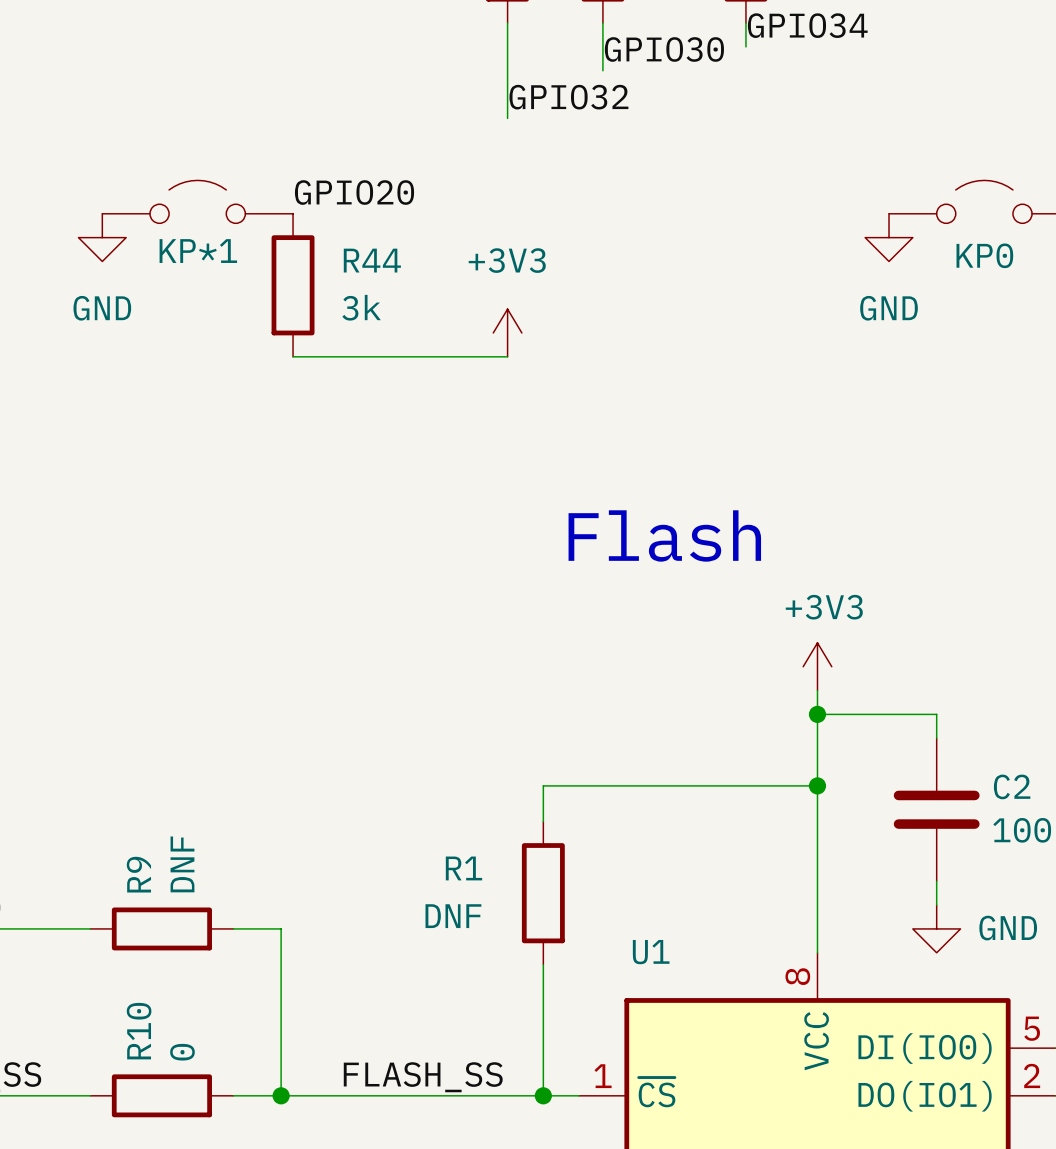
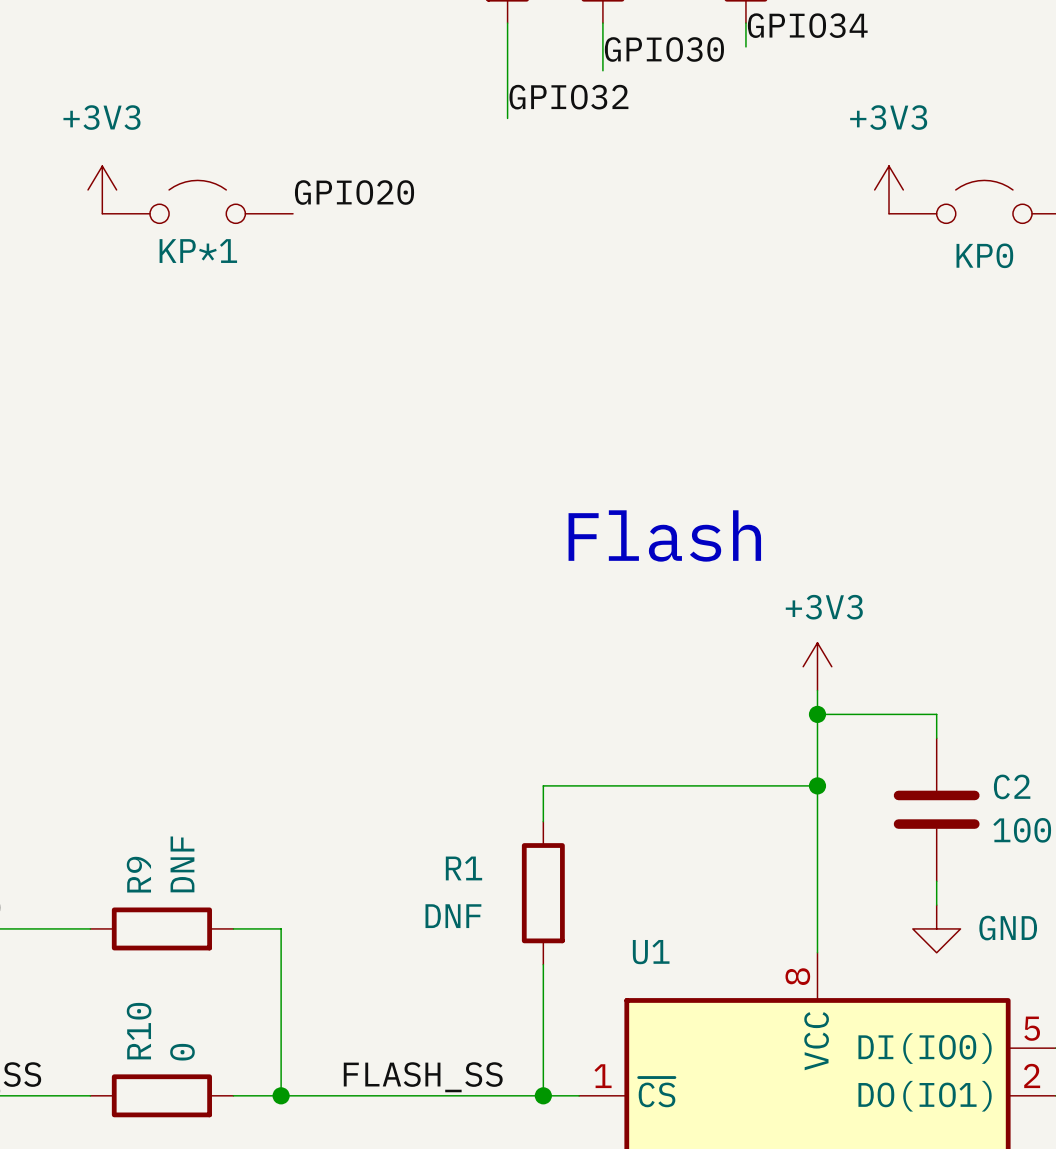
power symbol: none -> +3V3 (102, 189)
power symbol: none -> +3V3 (889, 189)
power symbol: GND (102, 237) -> none
power symbol: GND (889, 237) -> none
R44: 3k (293, 285) -> none
power symbol: +3V3 (507, 332) -> none
wire: (293, 356) (507, 356) -> none

